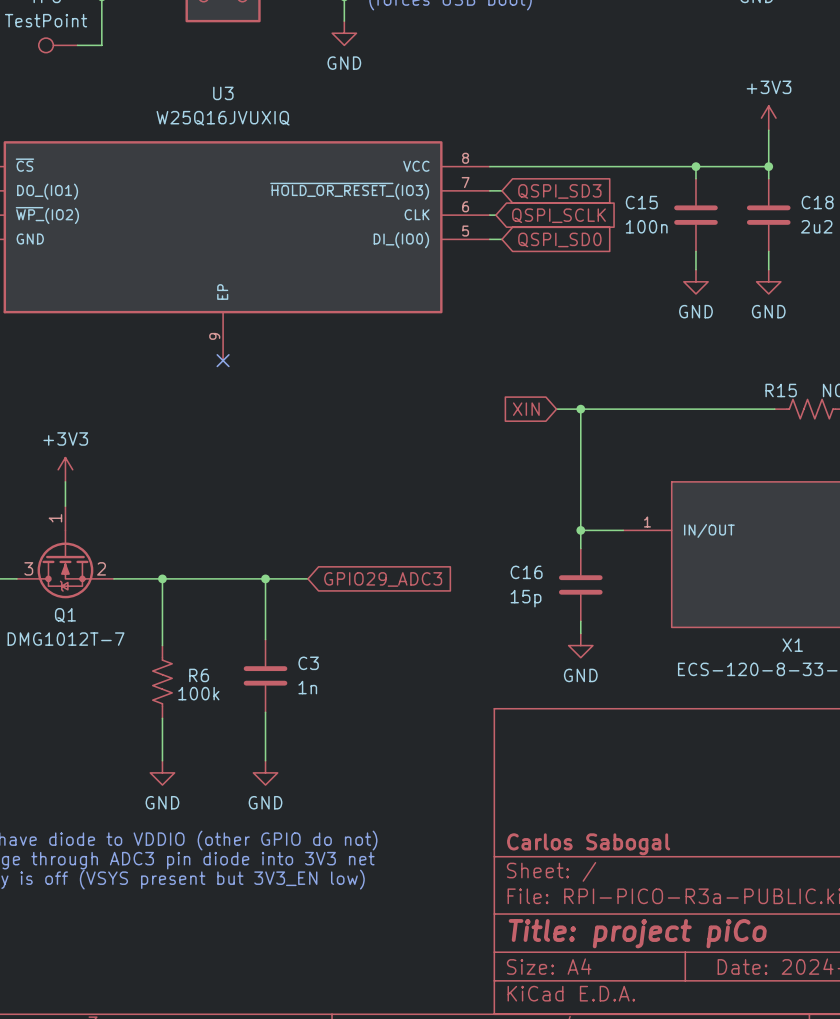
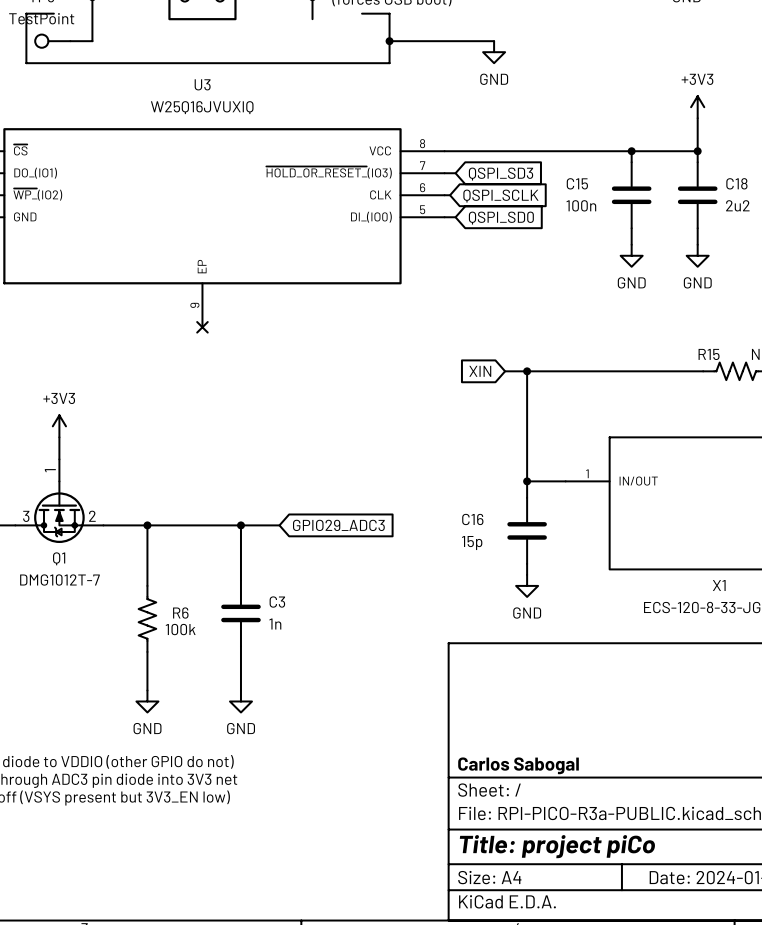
wire: none -> (53, 13) (26, 13) (26, 63) (389, 63) (389, 13) (362, 13)
power symbol position: GND (344, 33) -> GND (494, 52)
wire: none -> (389, 41) (494, 41)
junction: none -> (389, 41)

